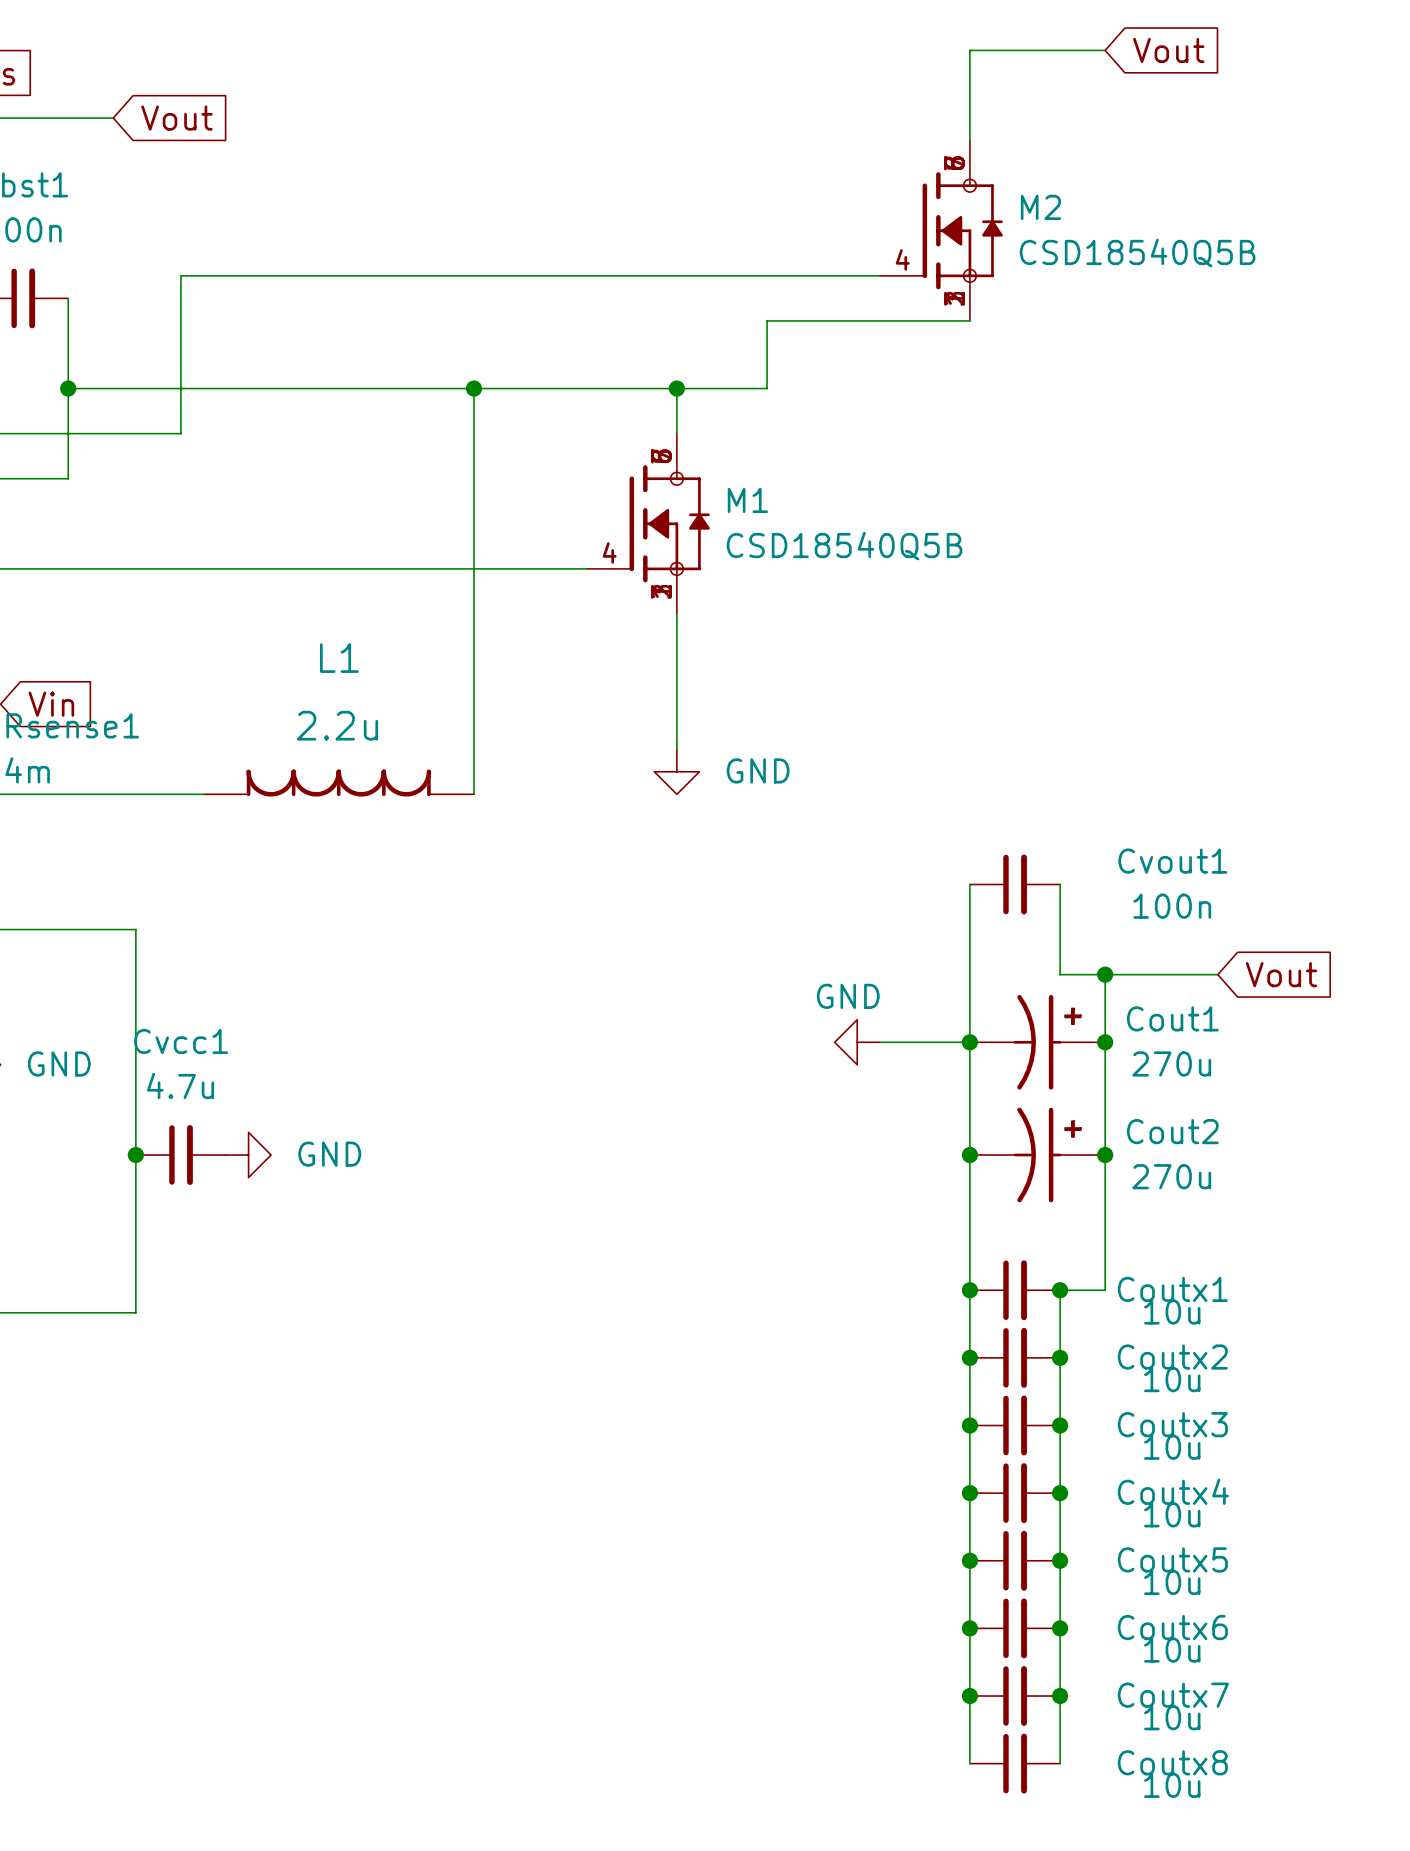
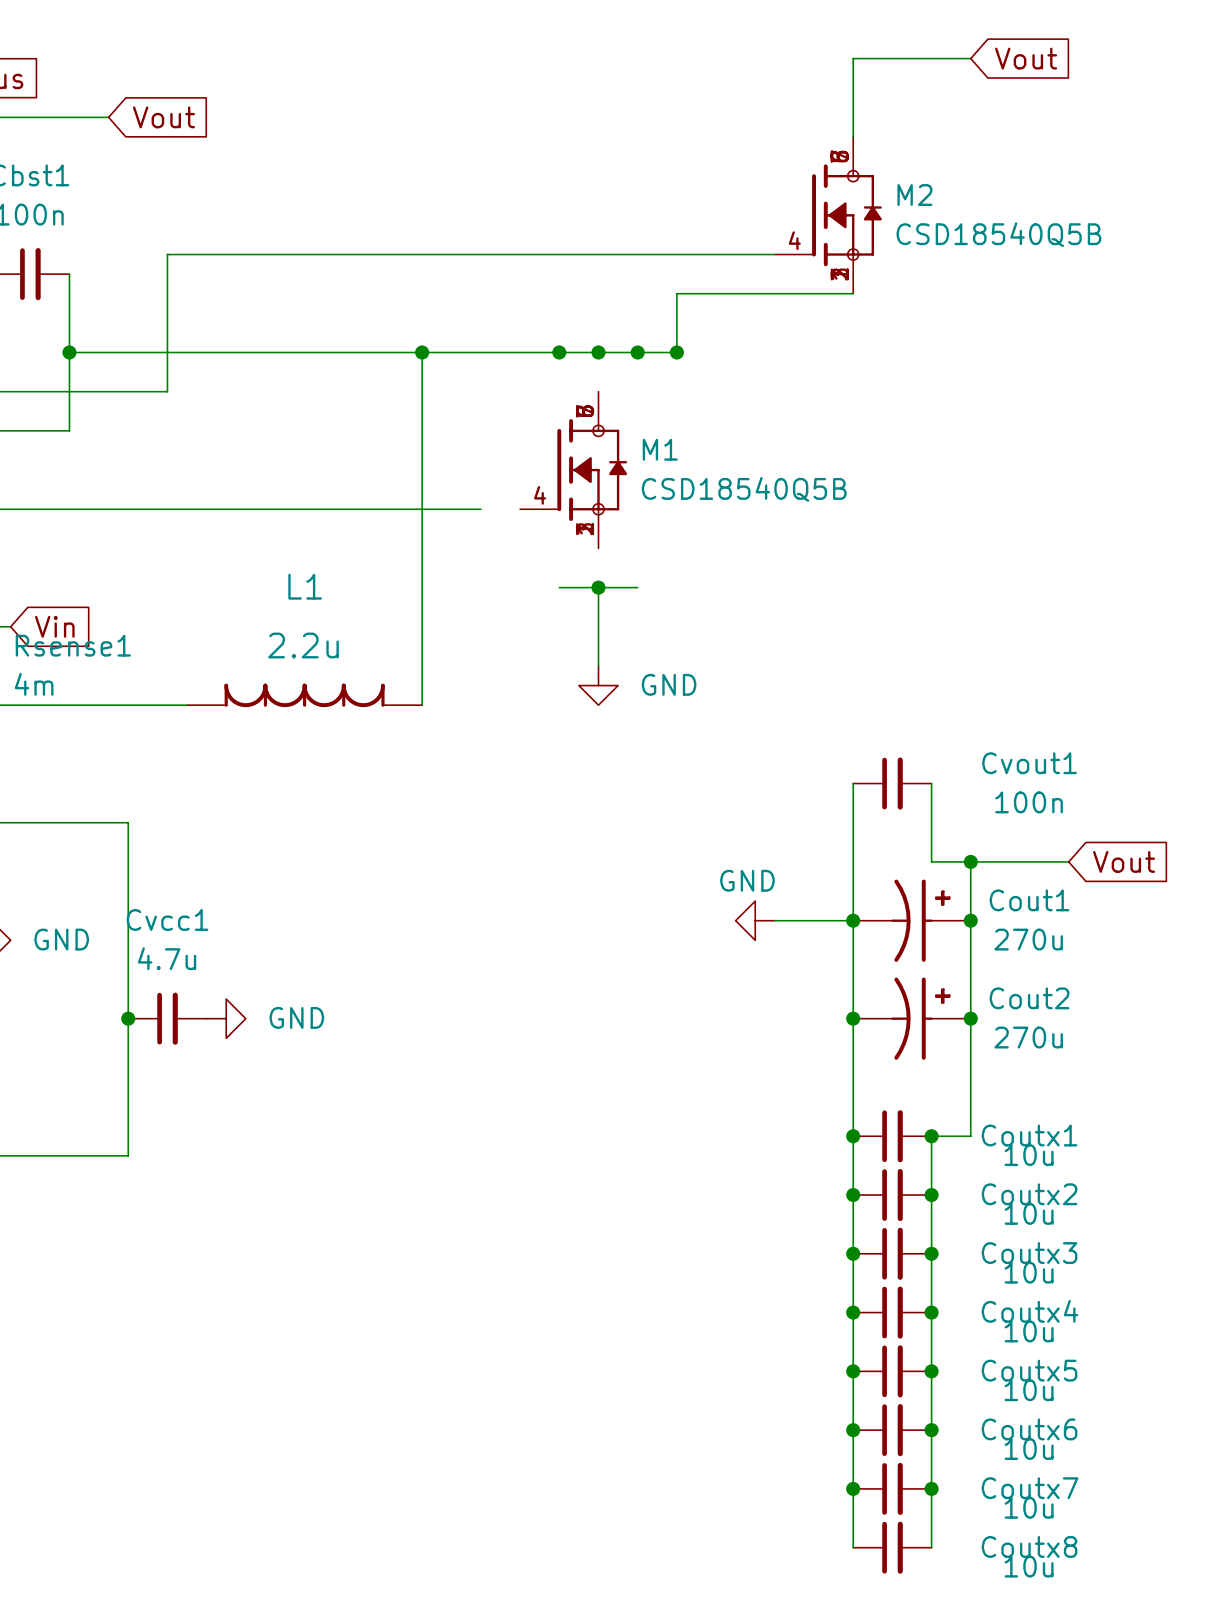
junction: none -> (559, 352)
wire: (676, 388) (676, 433) -> none
junction: none -> (637, 352)
junction: none -> (676, 352)
wire: (541, 568) (586, 568) -> none
wire: (676, 613) (676, 659) -> none
wire: none -> (559, 587) (637, 587)
junction: none -> (598, 587)

